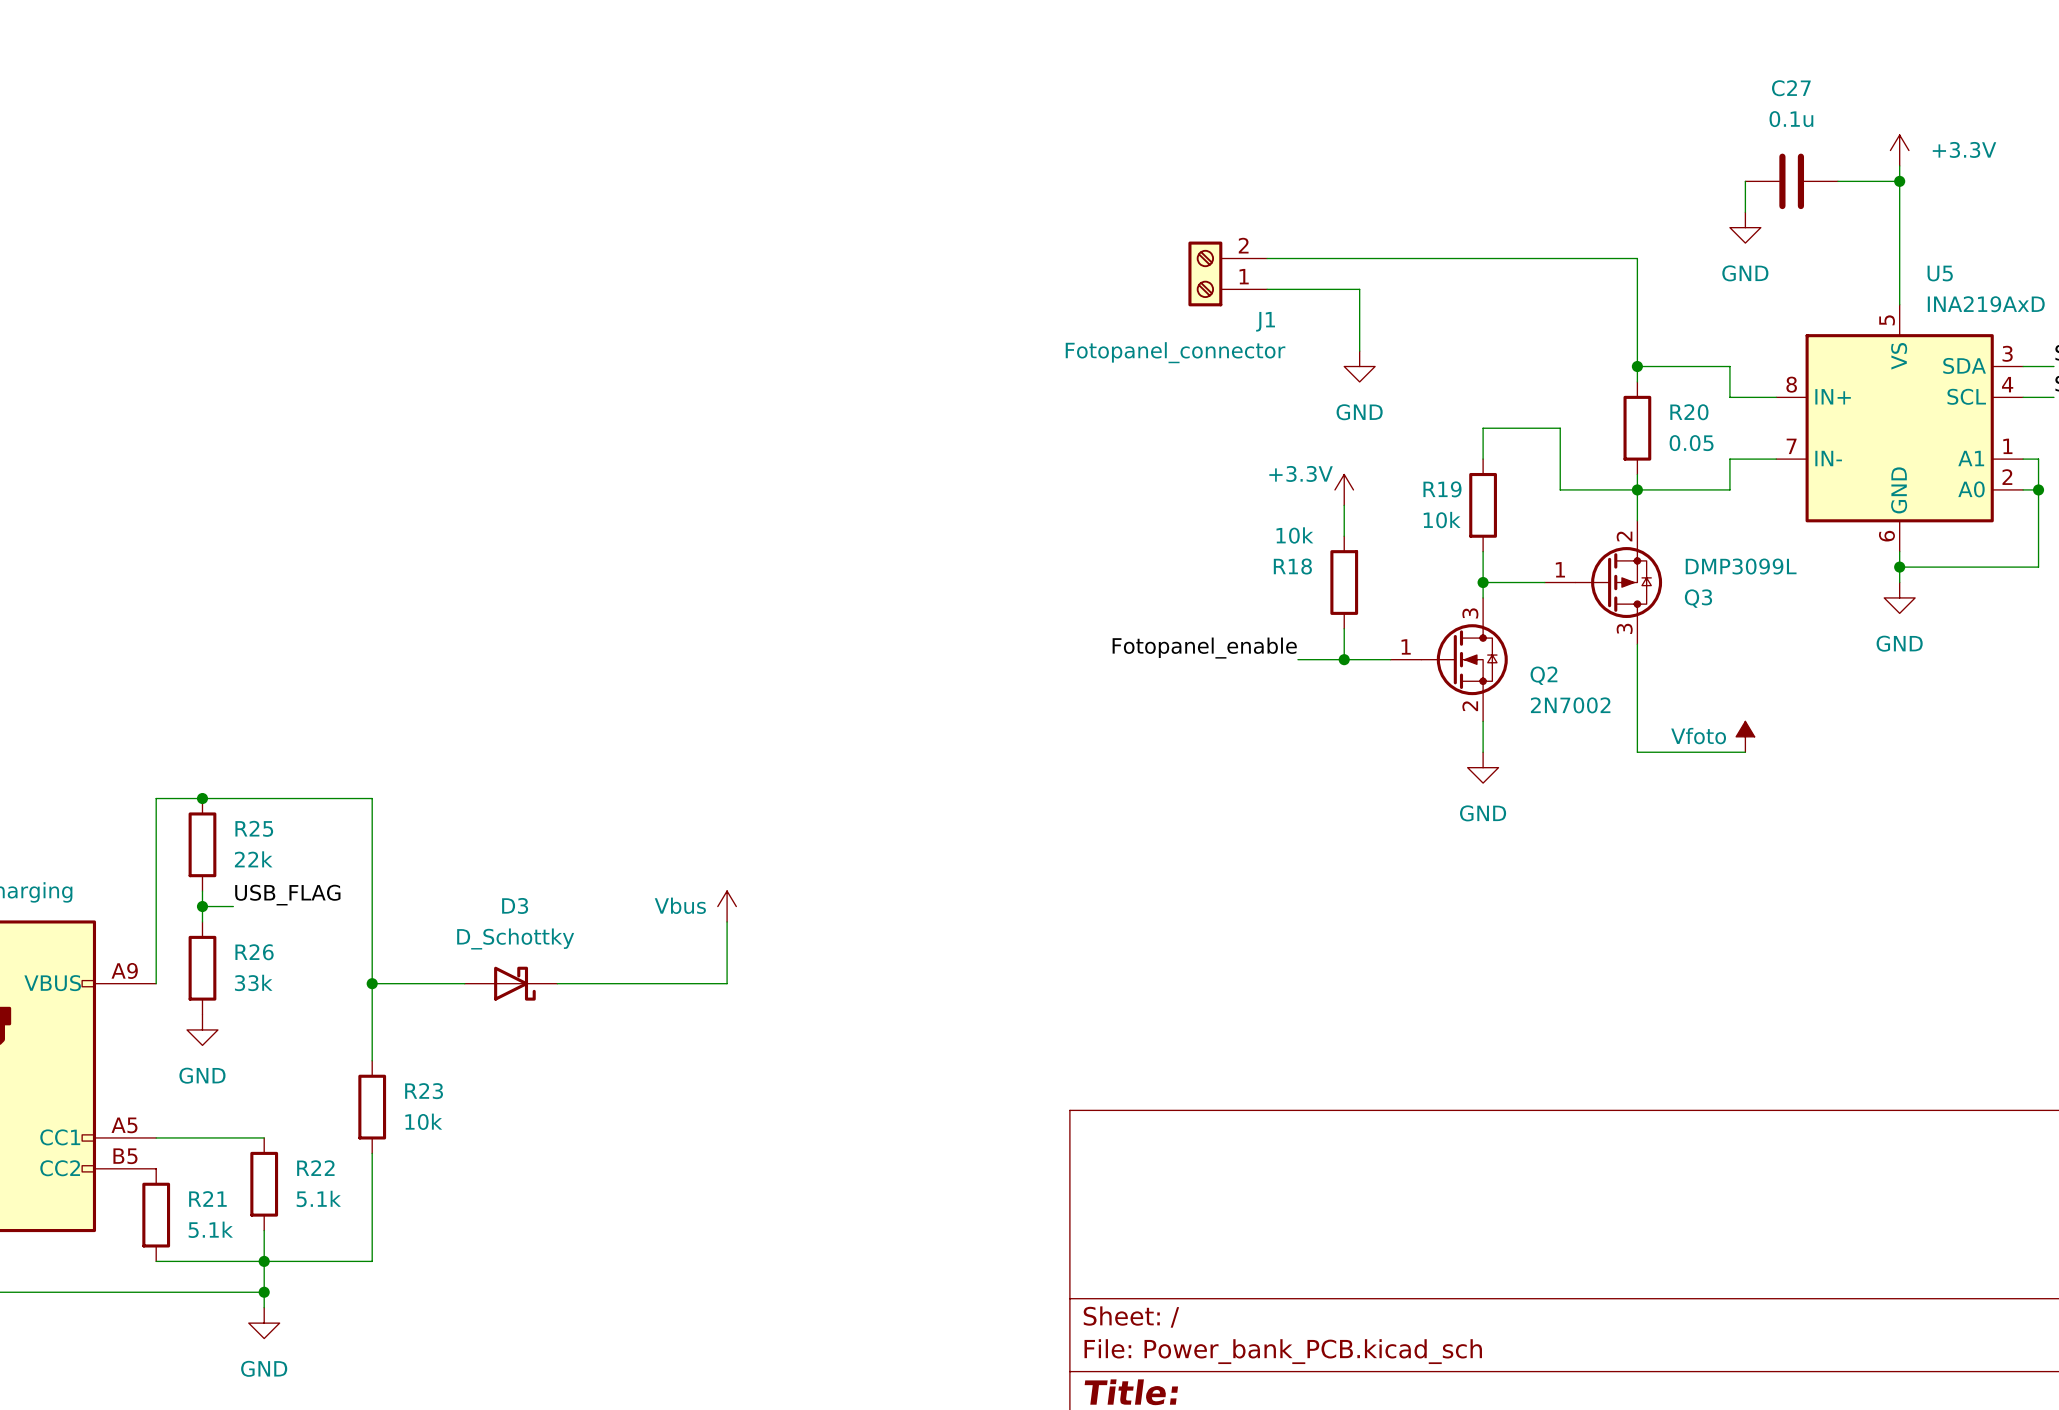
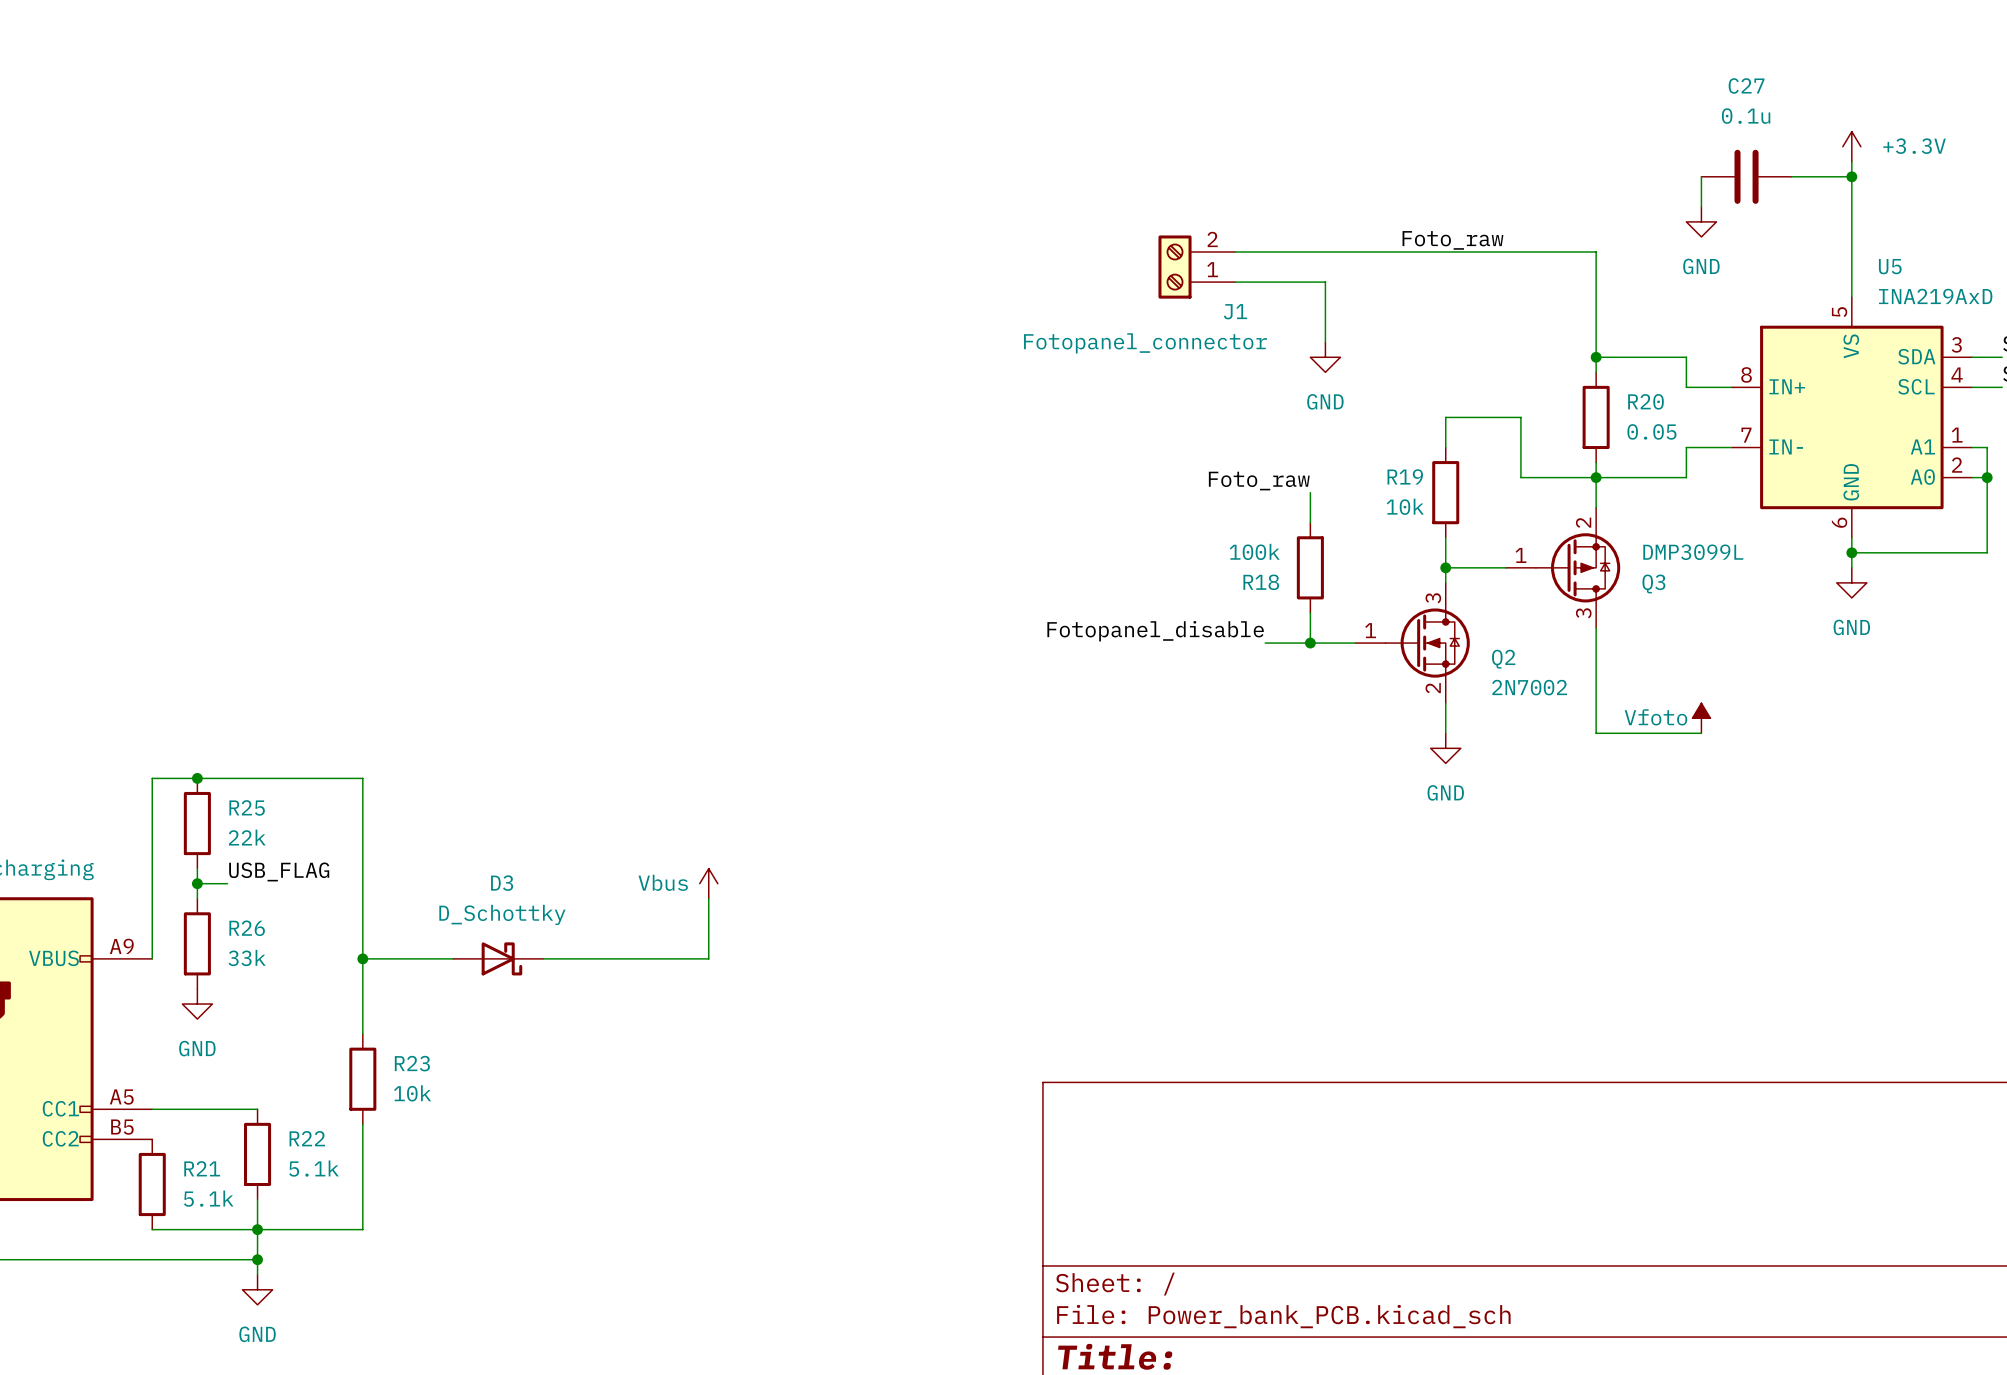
label: none -> Foto_raw (1452, 240)
power symbol: +3.3V (1344, 489) -> none
label: none -> Foto_raw (1259, 481)
R18 value: 10k (1294, 535) -> 100k (1254, 551)
R18 name position: R18 (1292, 566) -> R18 (1261, 582)
label: Fotopanel_enable (1204, 648) -> Fotopanel_disable (1155, 631)

